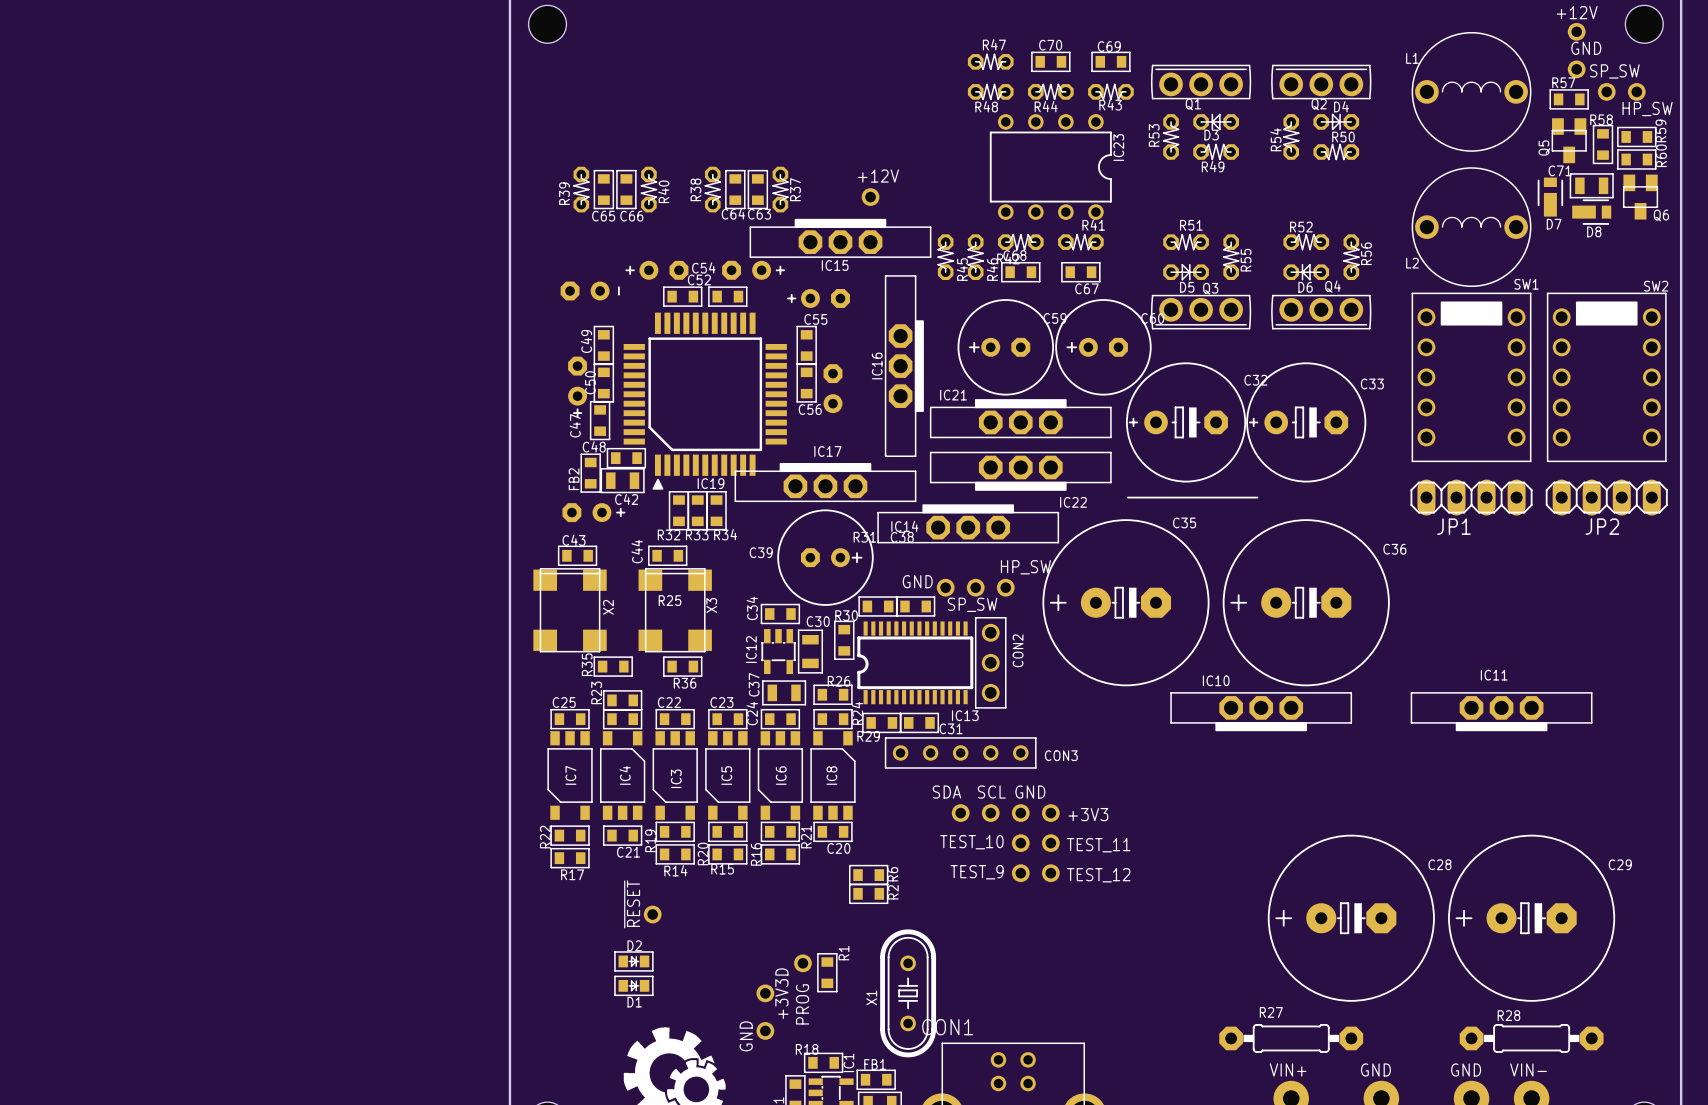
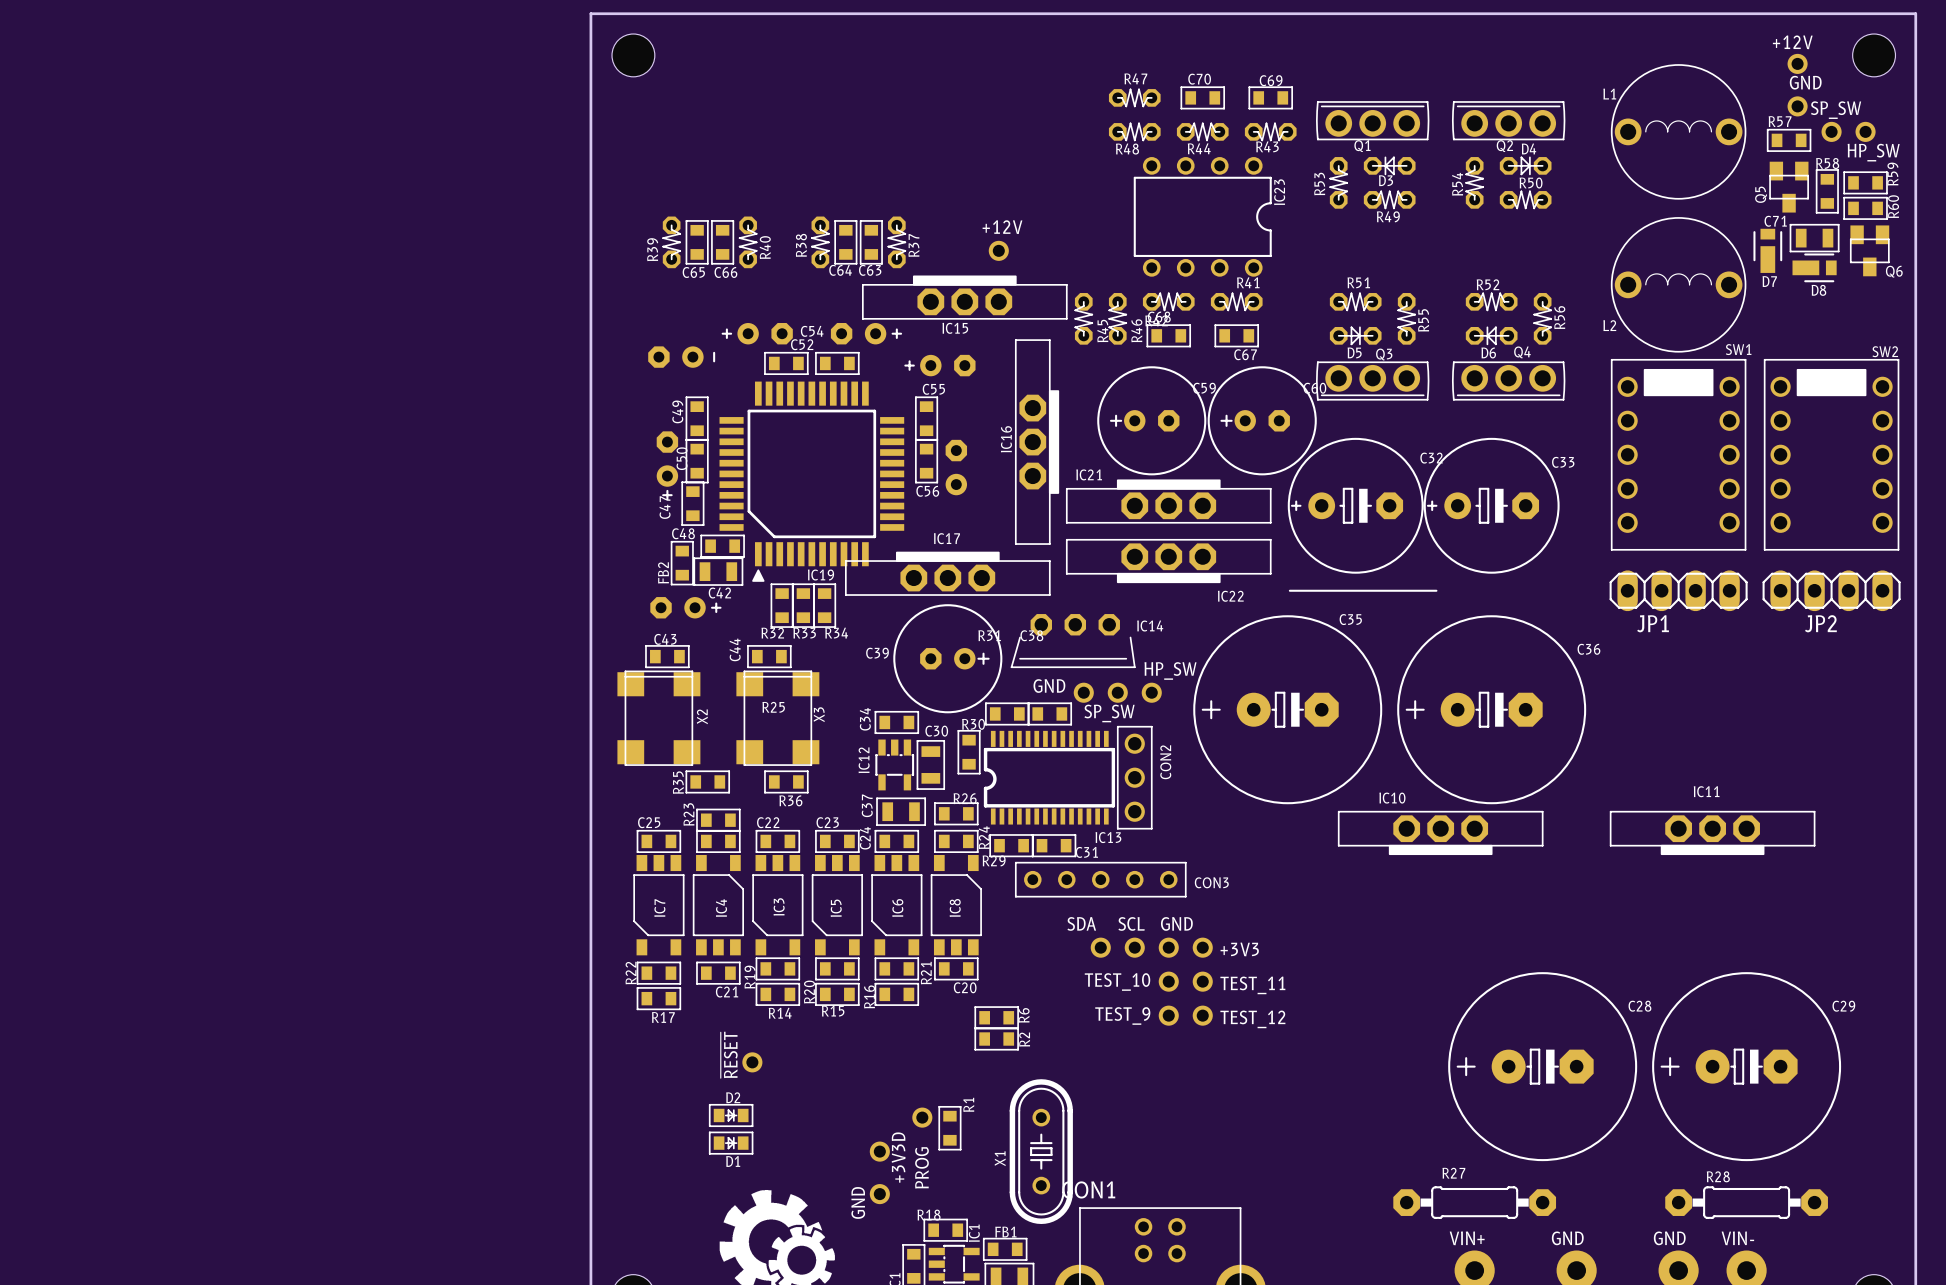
IC14 footprint: [877, 504, 1060, 544] -> [1010, 614, 1136, 669]
IC14 name position: IC14 (904, 526) -> IC14 (1150, 626)

